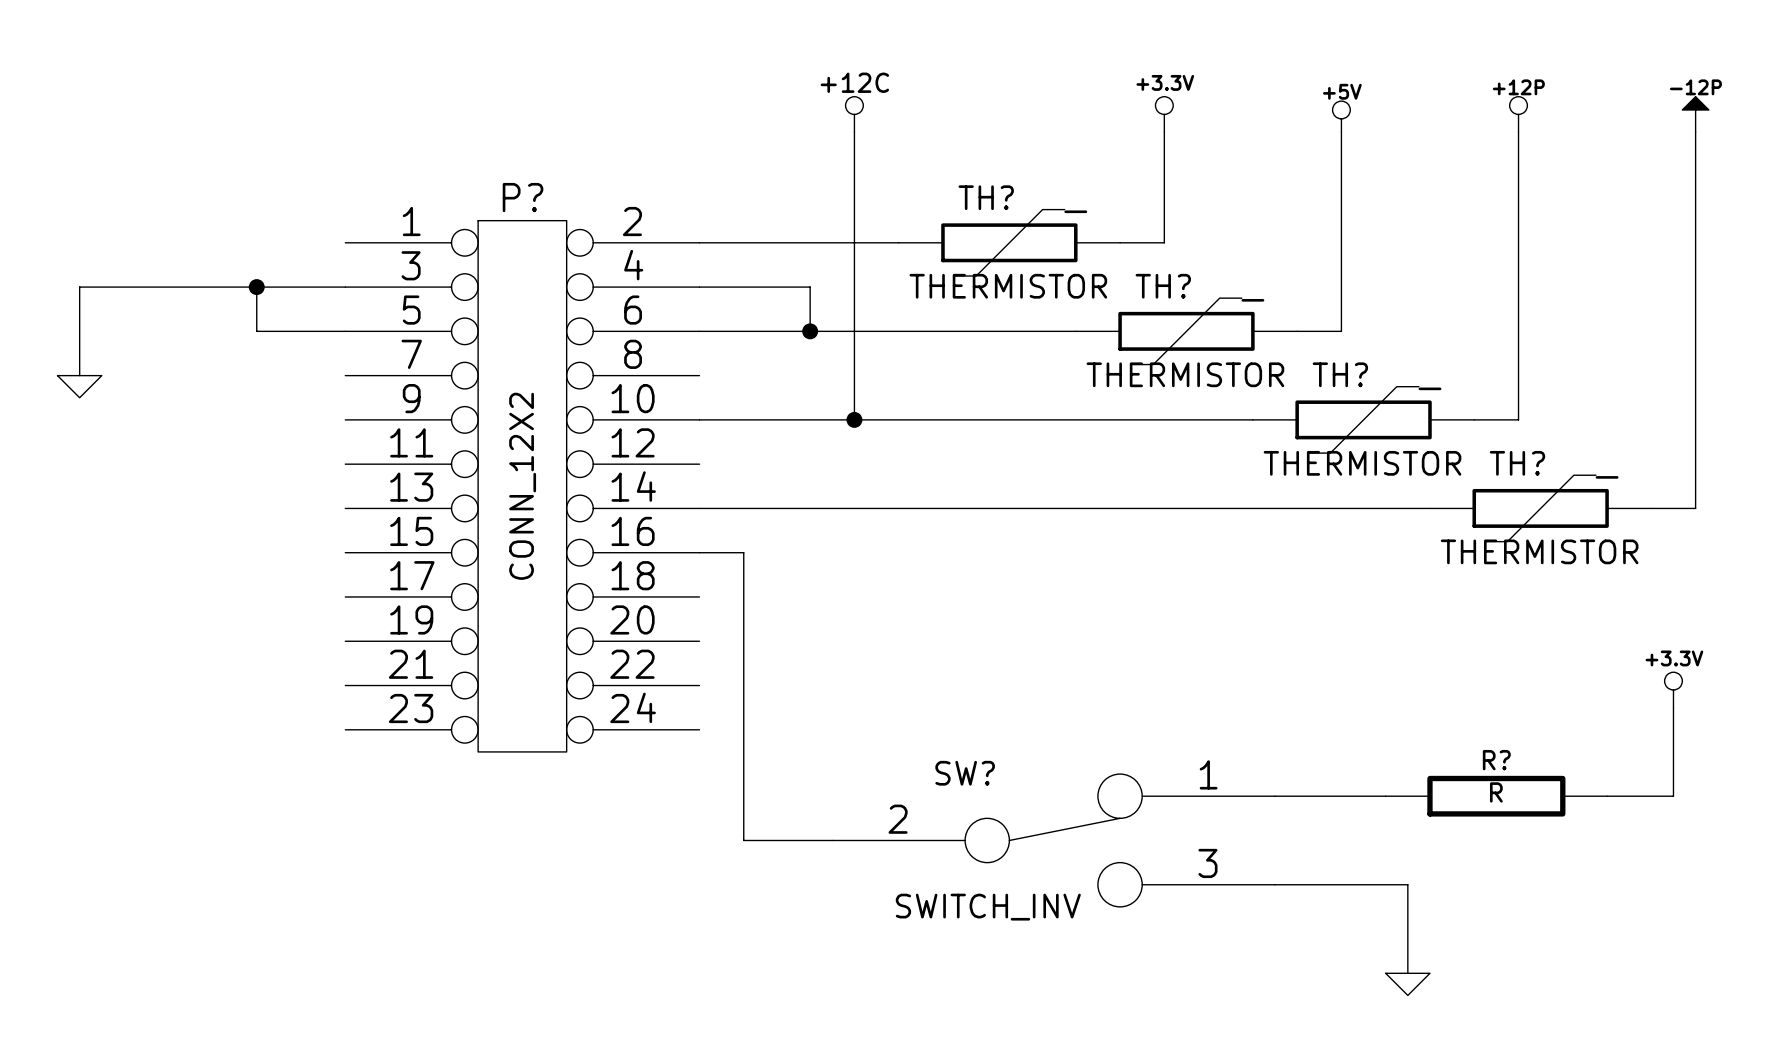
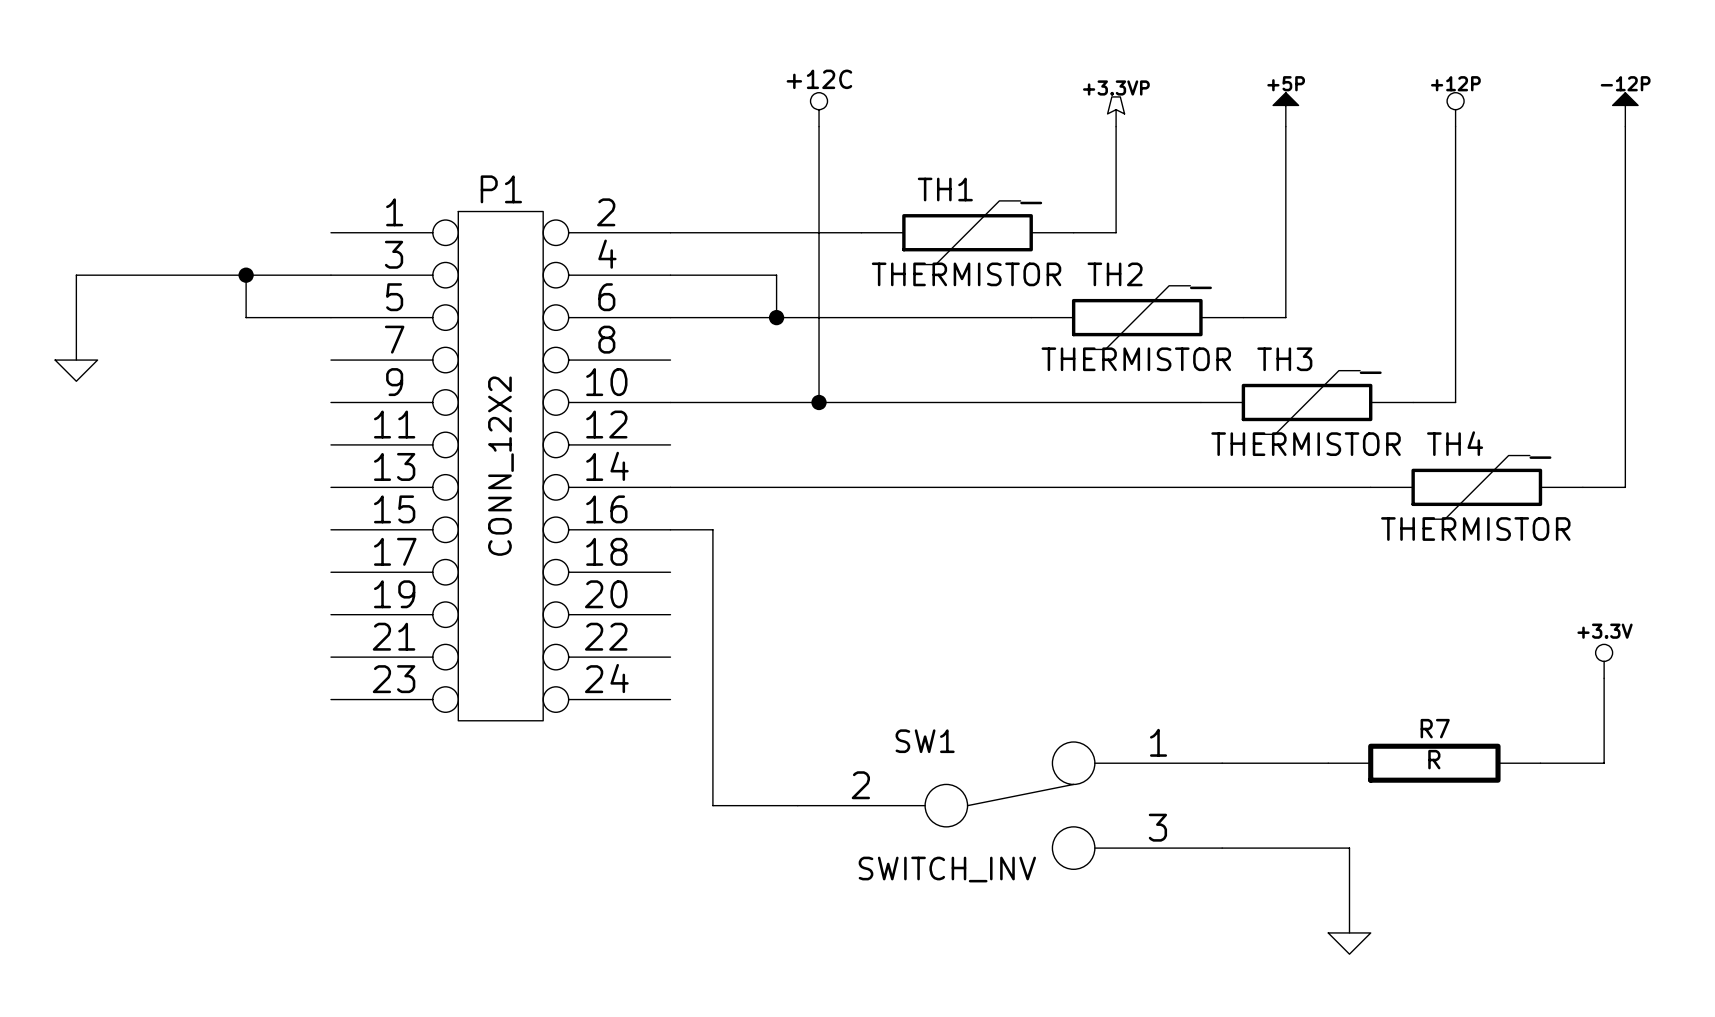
power symbol: +3.3V (1164, 114) -> +3.3VP (1116, 111)
power symbol: +5V (1341, 116) -> +5P (1285, 109)
P? name: P? (523, 197) -> P1 (501, 189)
TH? name: TH? (986, 197) -> TH1 (945, 189)
TH? name: TH? (1163, 286) -> TH2 (1115, 274)
TH? name: TH? (1340, 374) -> TH3 (1284, 359)
TH? name: TH? (1517, 463) -> TH4 (1455, 443)
R? name: R? (1496, 760) -> R7 (1435, 728)
SW? name: SW? (965, 773) -> SW1 (925, 741)

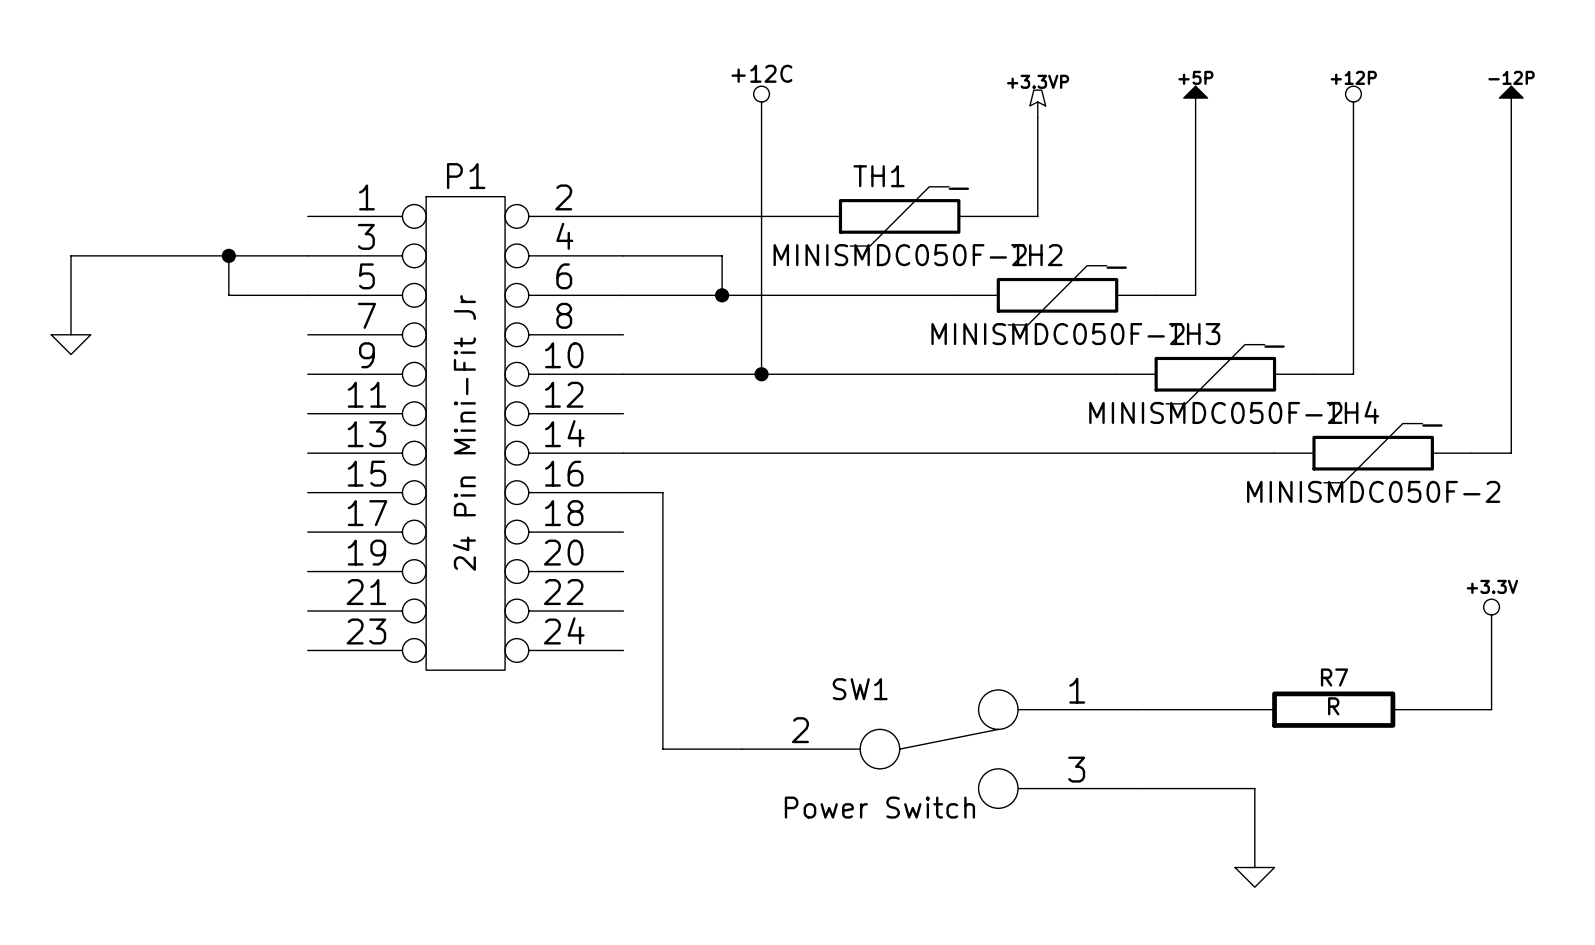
TH1 value: THERMISTOR (966, 274) -> MINISMDC050F-2 (900, 255)
TH2 value: THERMISTOR (1136, 359) -> MINISMDC050F-2 (1057, 334)
TH3 value: THERMISTOR (1306, 444) -> MINISMDC050F-2 (1215, 412)
P1 value: CONN_12X2 (500, 466) -> 24 Pin Mini-Fit Jr (464, 432)
TH4 value: THERMISTOR (1475, 529) -> MINISMDC050F-2 (1373, 491)
SW1 value: SWITCH_INV (947, 869) -> Power Switch (879, 807)

